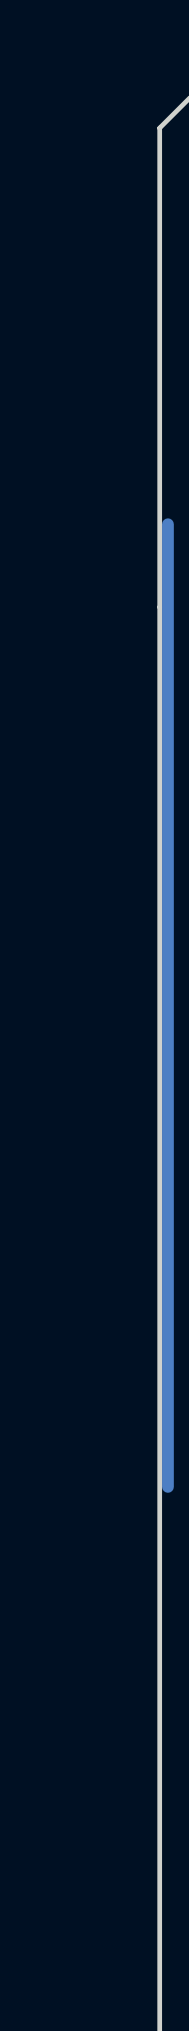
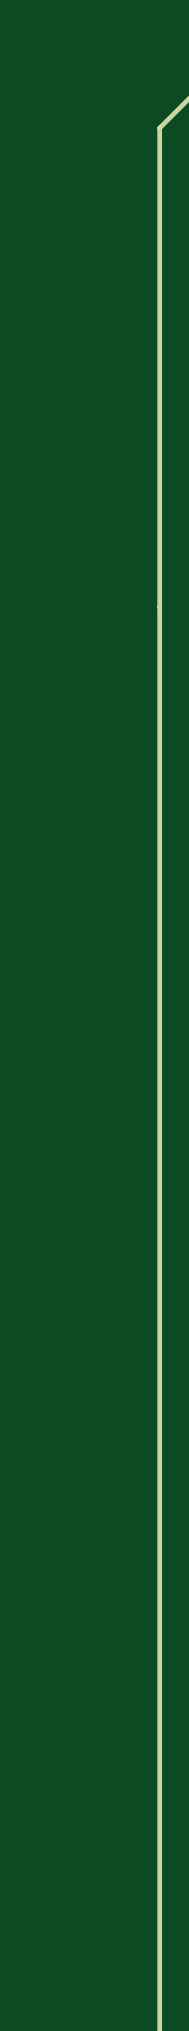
track: (167, 524) (167, 1486) -> none

